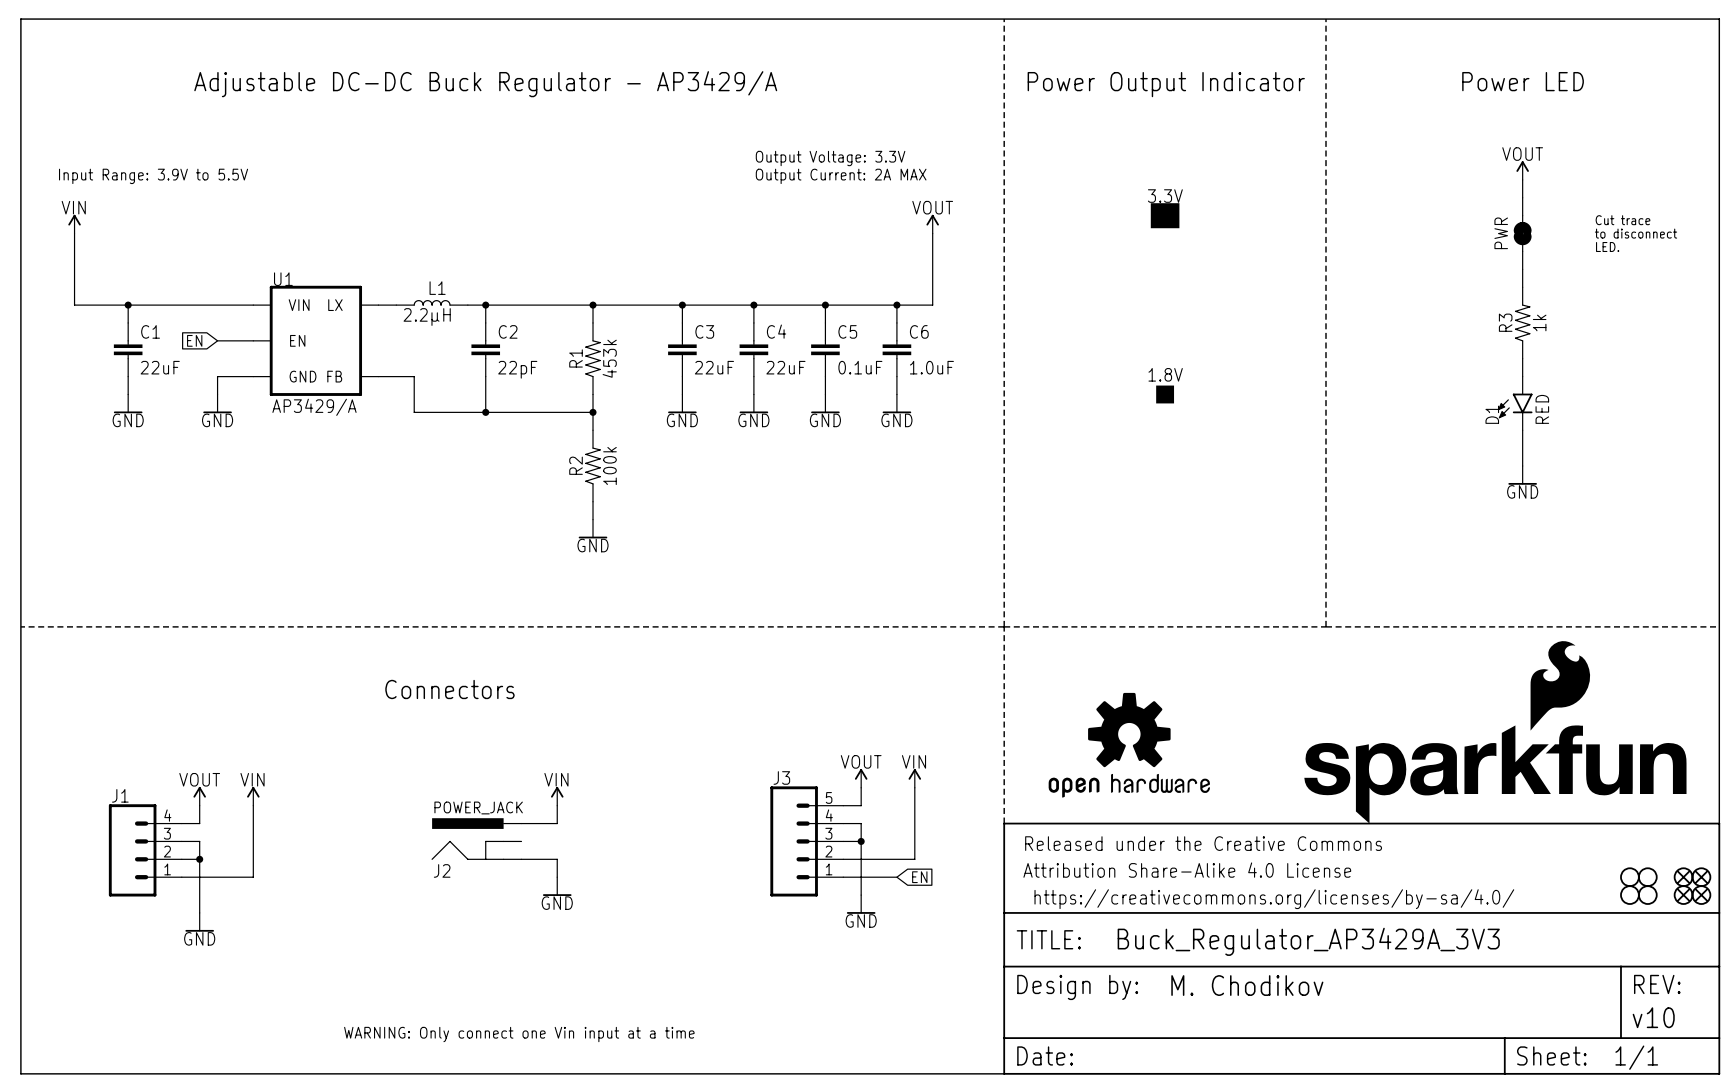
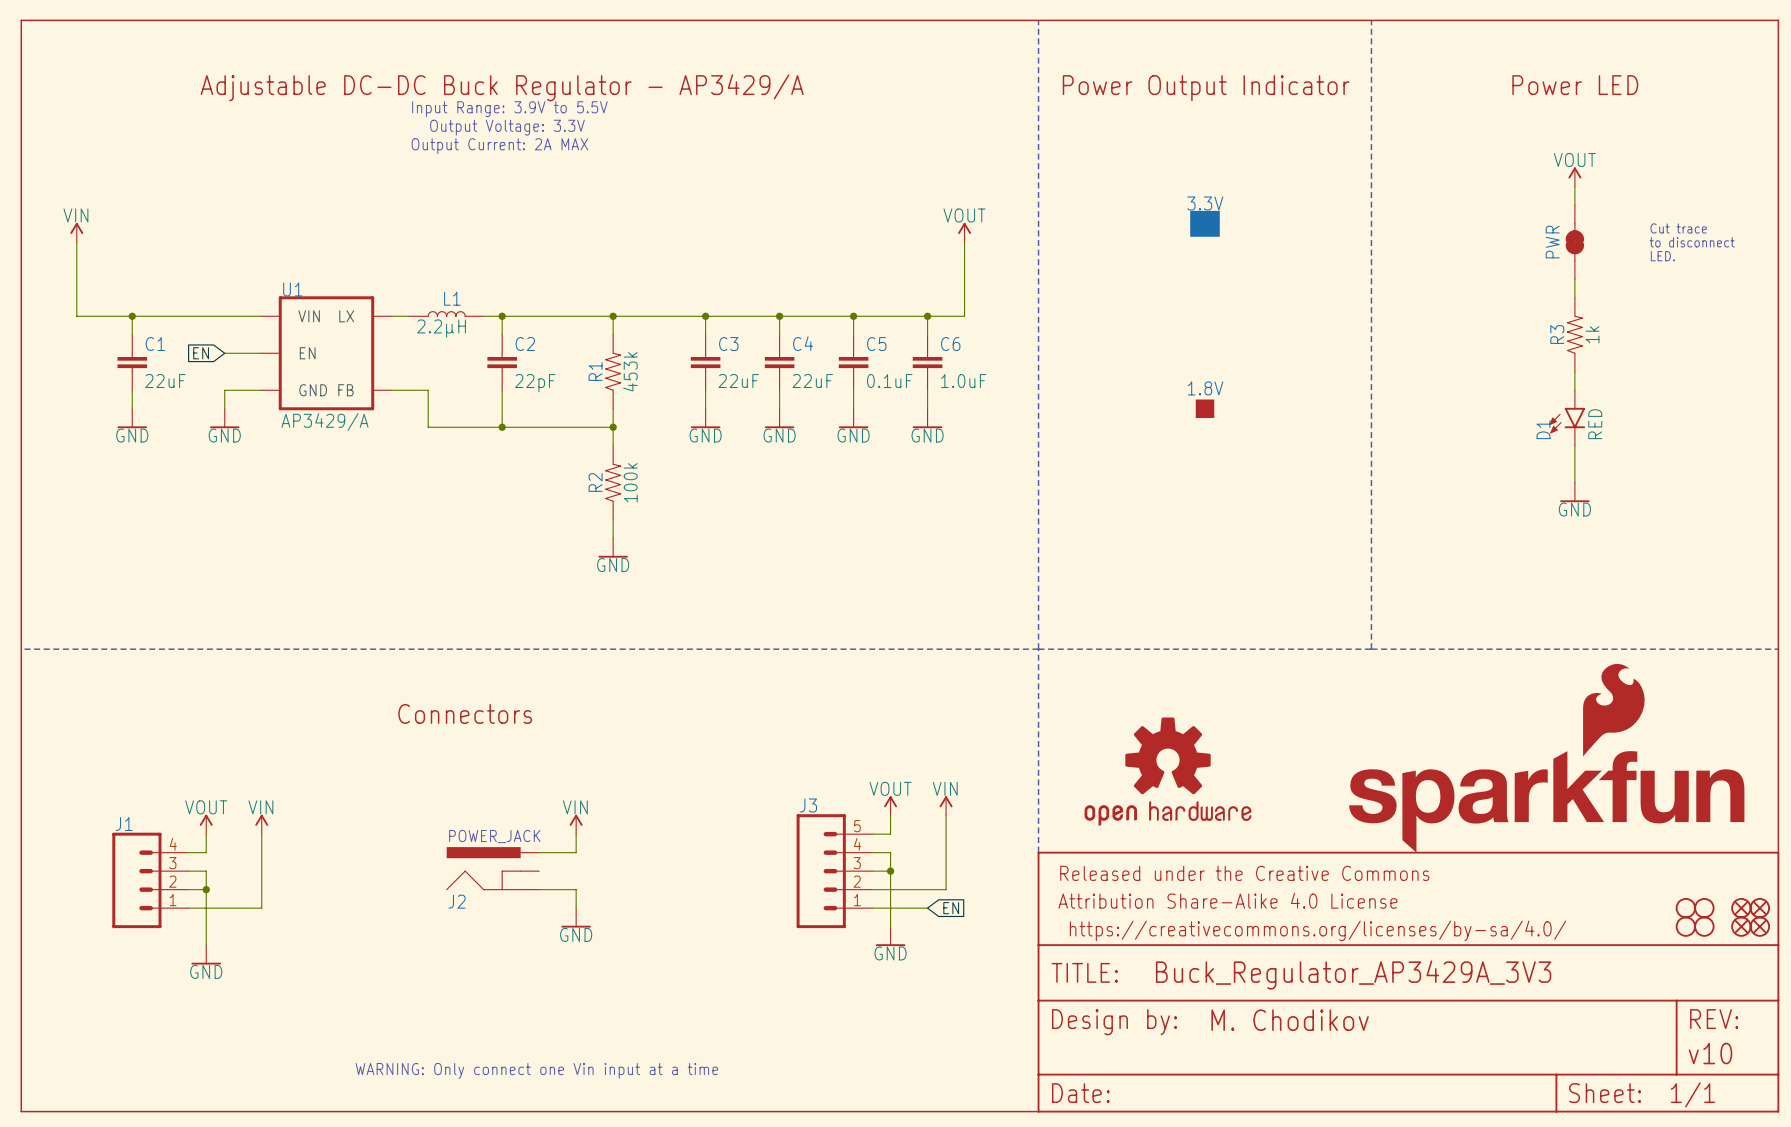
text: none -> Input Range: 3.9V to 5.5V (509, 109)
text: none -> Output Voltage: 3.3V (507, 127)
text: none -> Output Current: 2A MAX (499, 146)
text: Output Voltage: 3.3V (830, 158) -> none
text: Input Range: 3.9V to 5.5V (153, 176) -> none
text: Output Current: 2A MAX (841, 176) -> none

